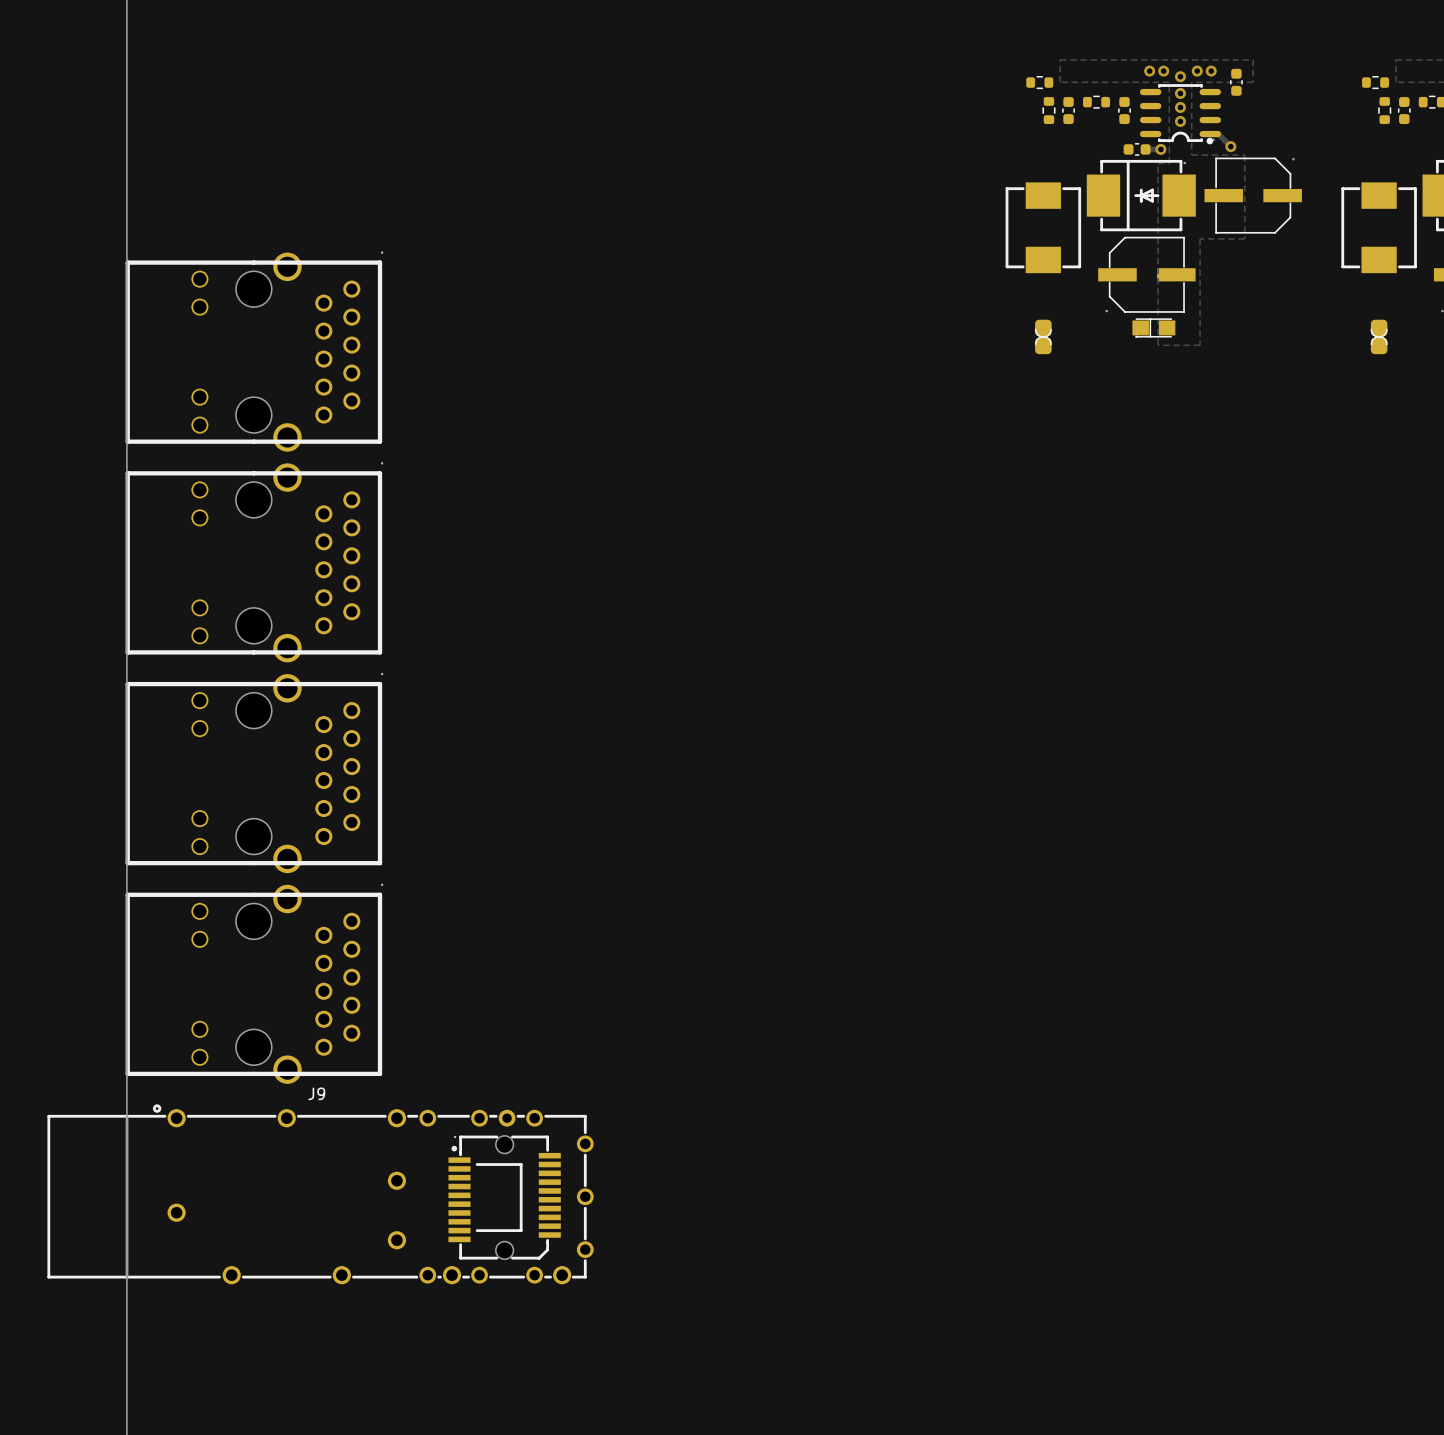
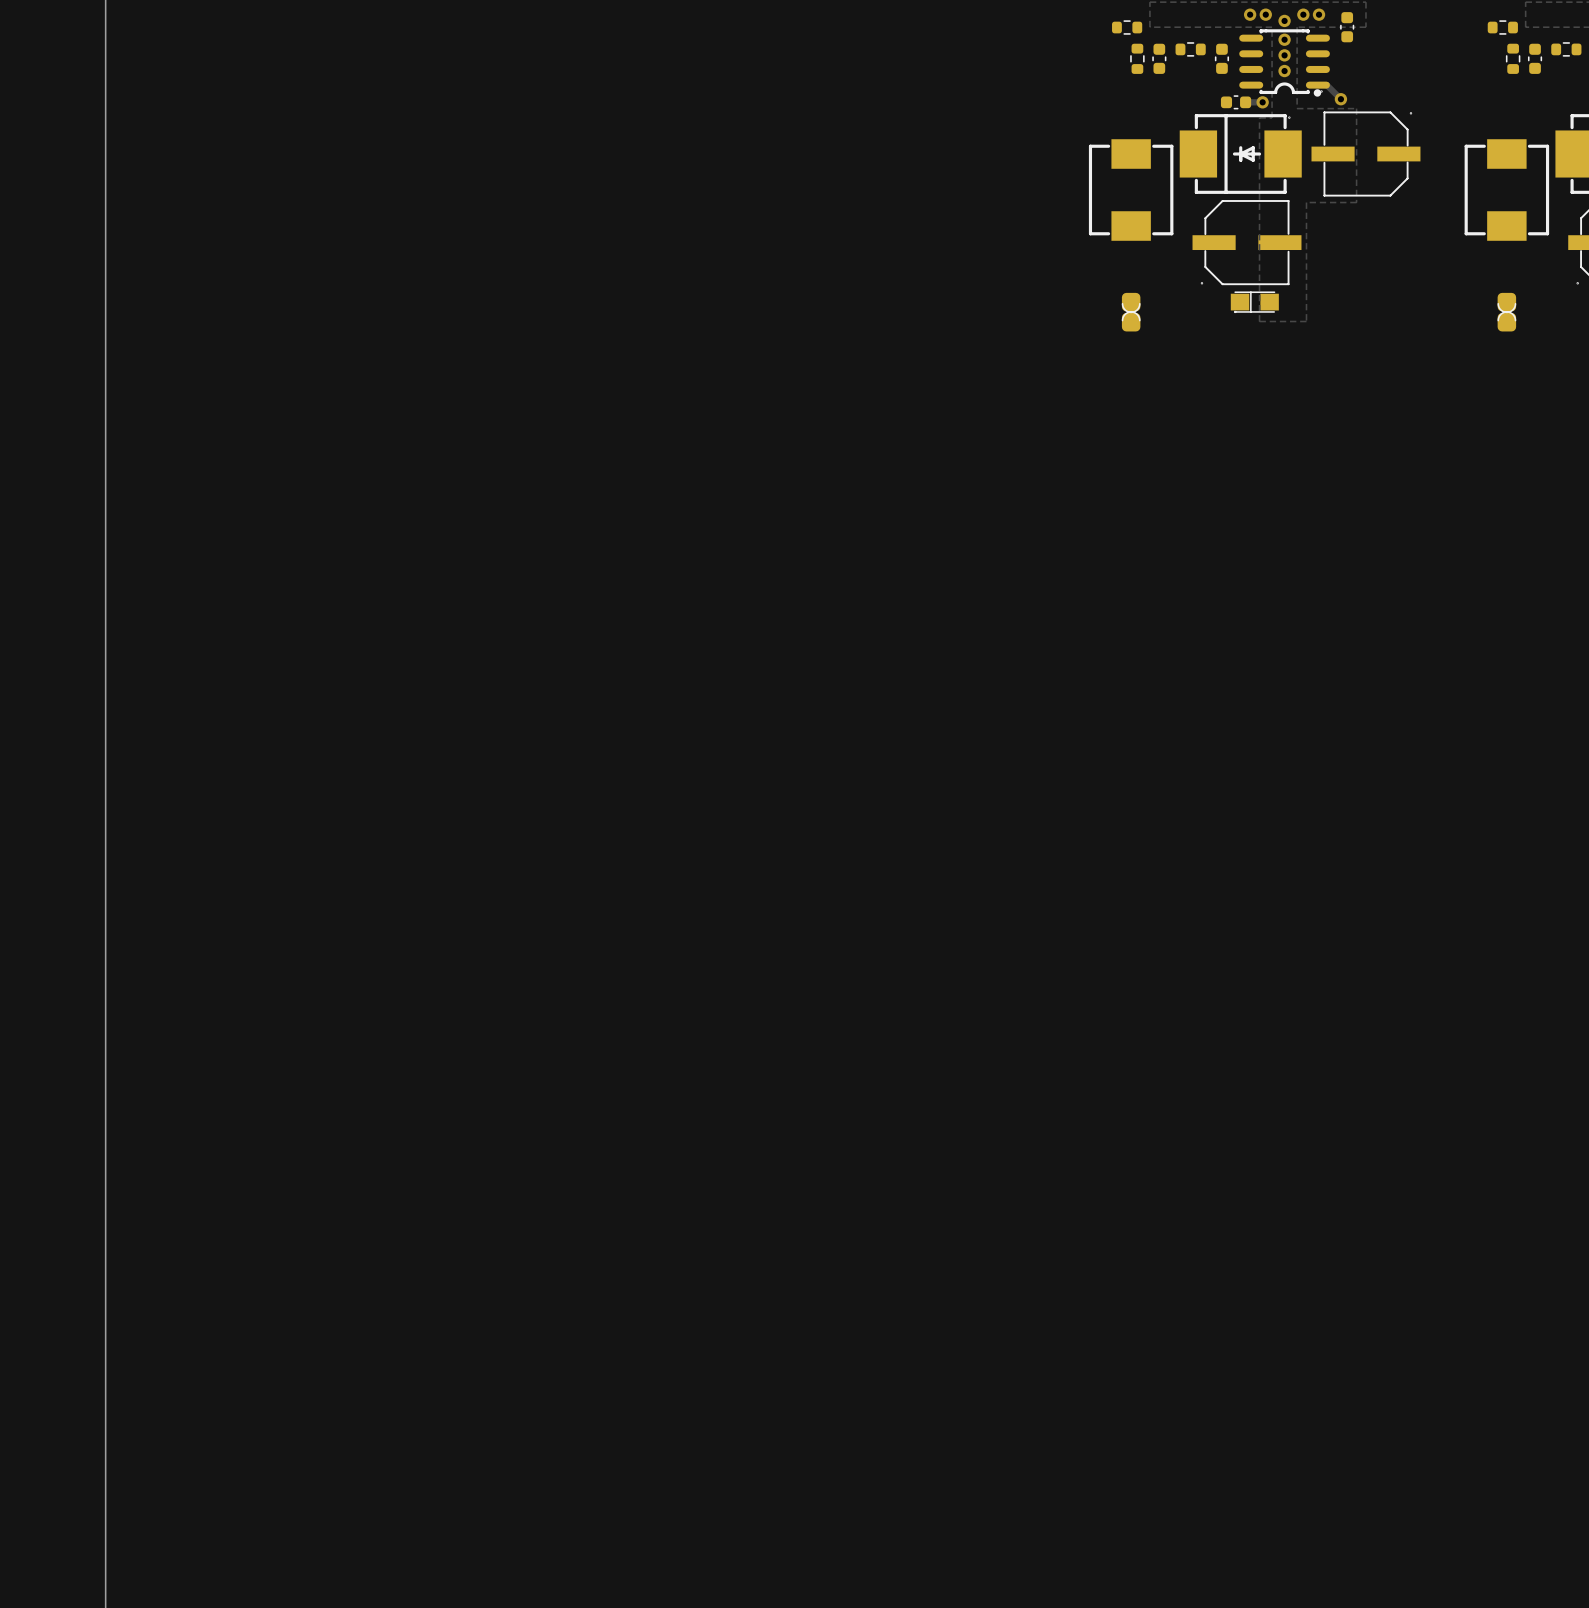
part: (254, 351) -> none
part: (254, 562) -> none
part: (254, 773) -> none
part: (254, 984) -> none
J9: (320, 1194) -> none
part: (504, 1197) -> none

